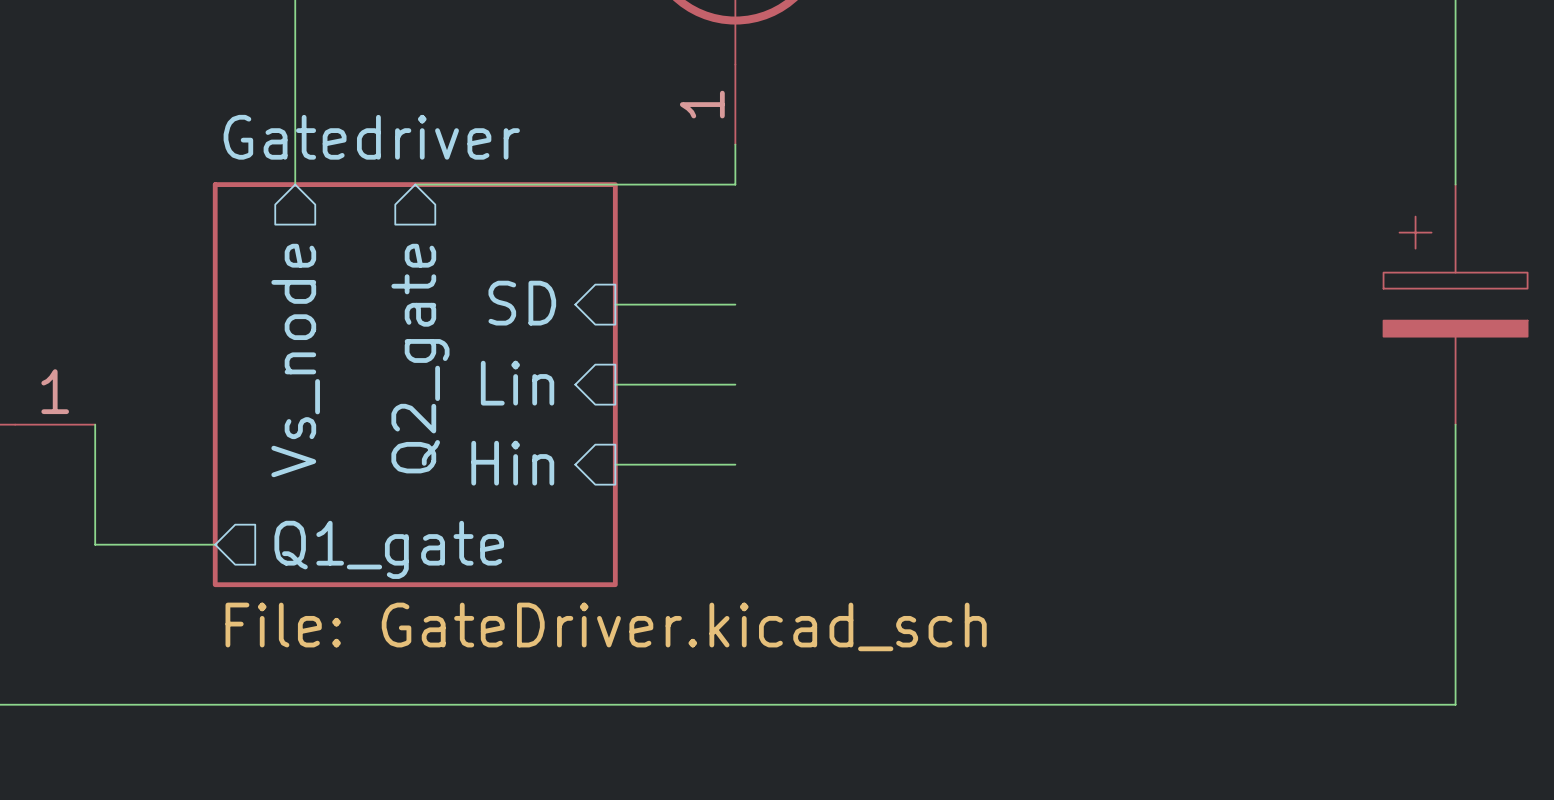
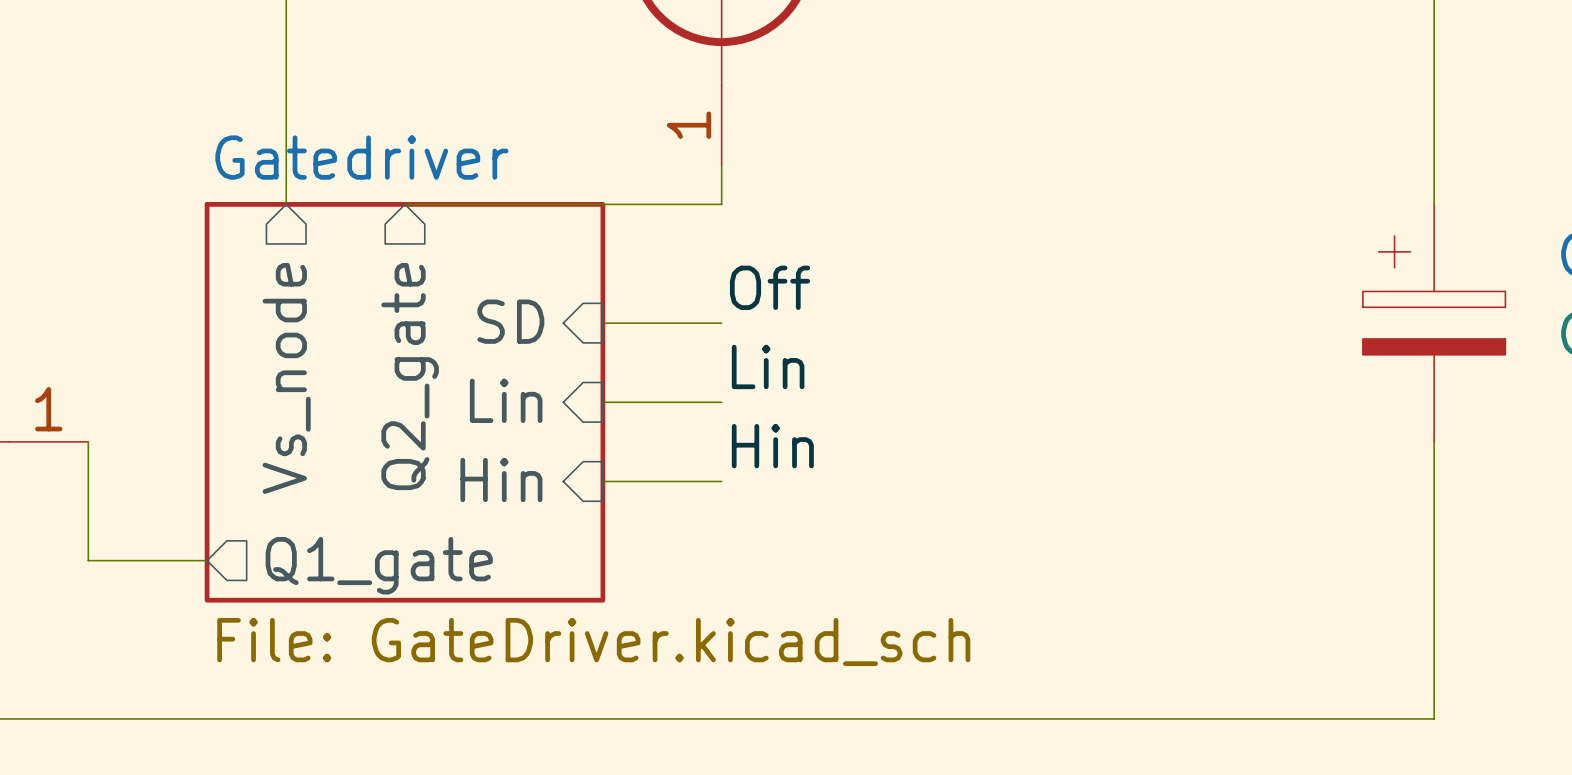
label: none -> Off (770, 287)
label: none -> Lin (768, 366)
label: none -> Hin (772, 446)

